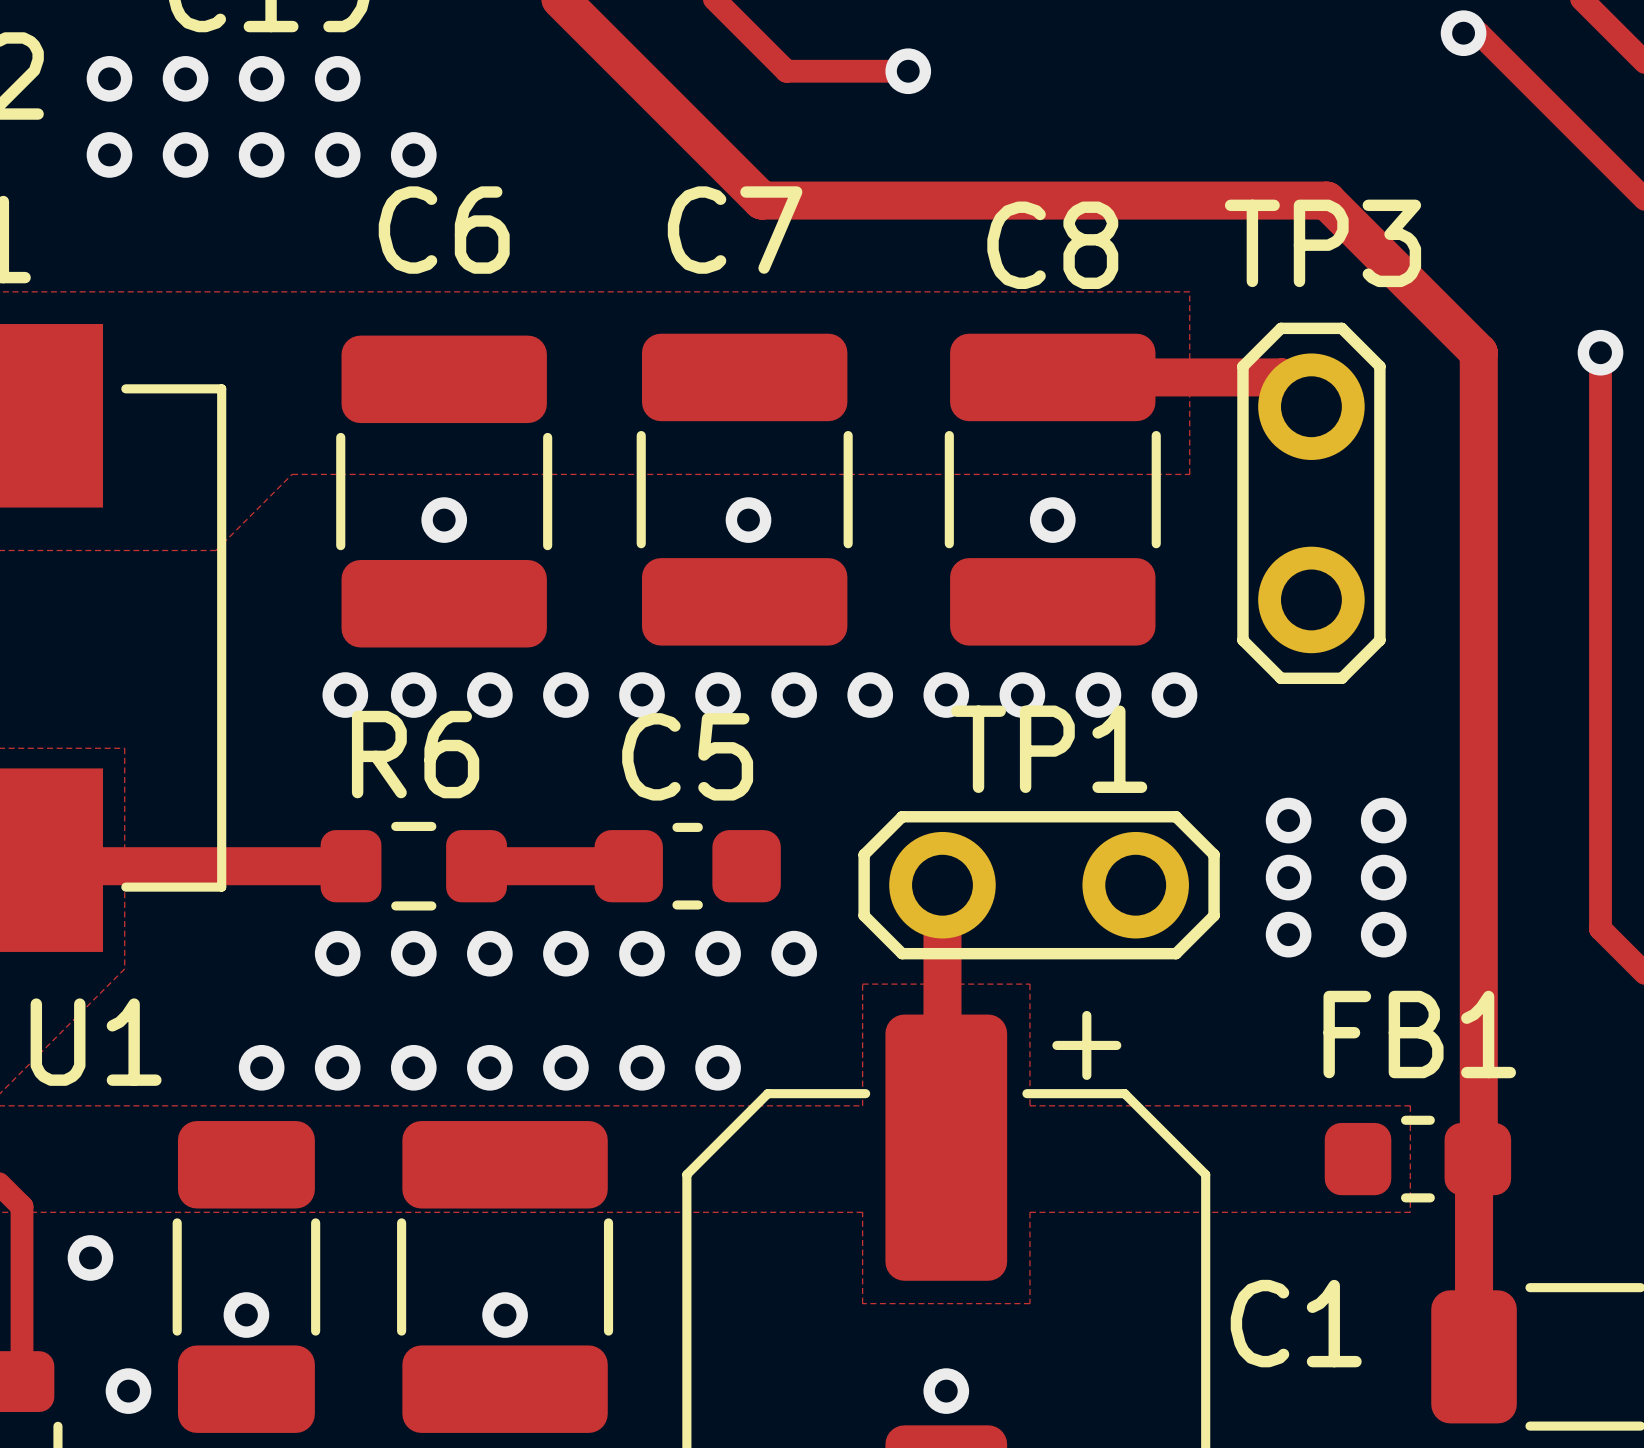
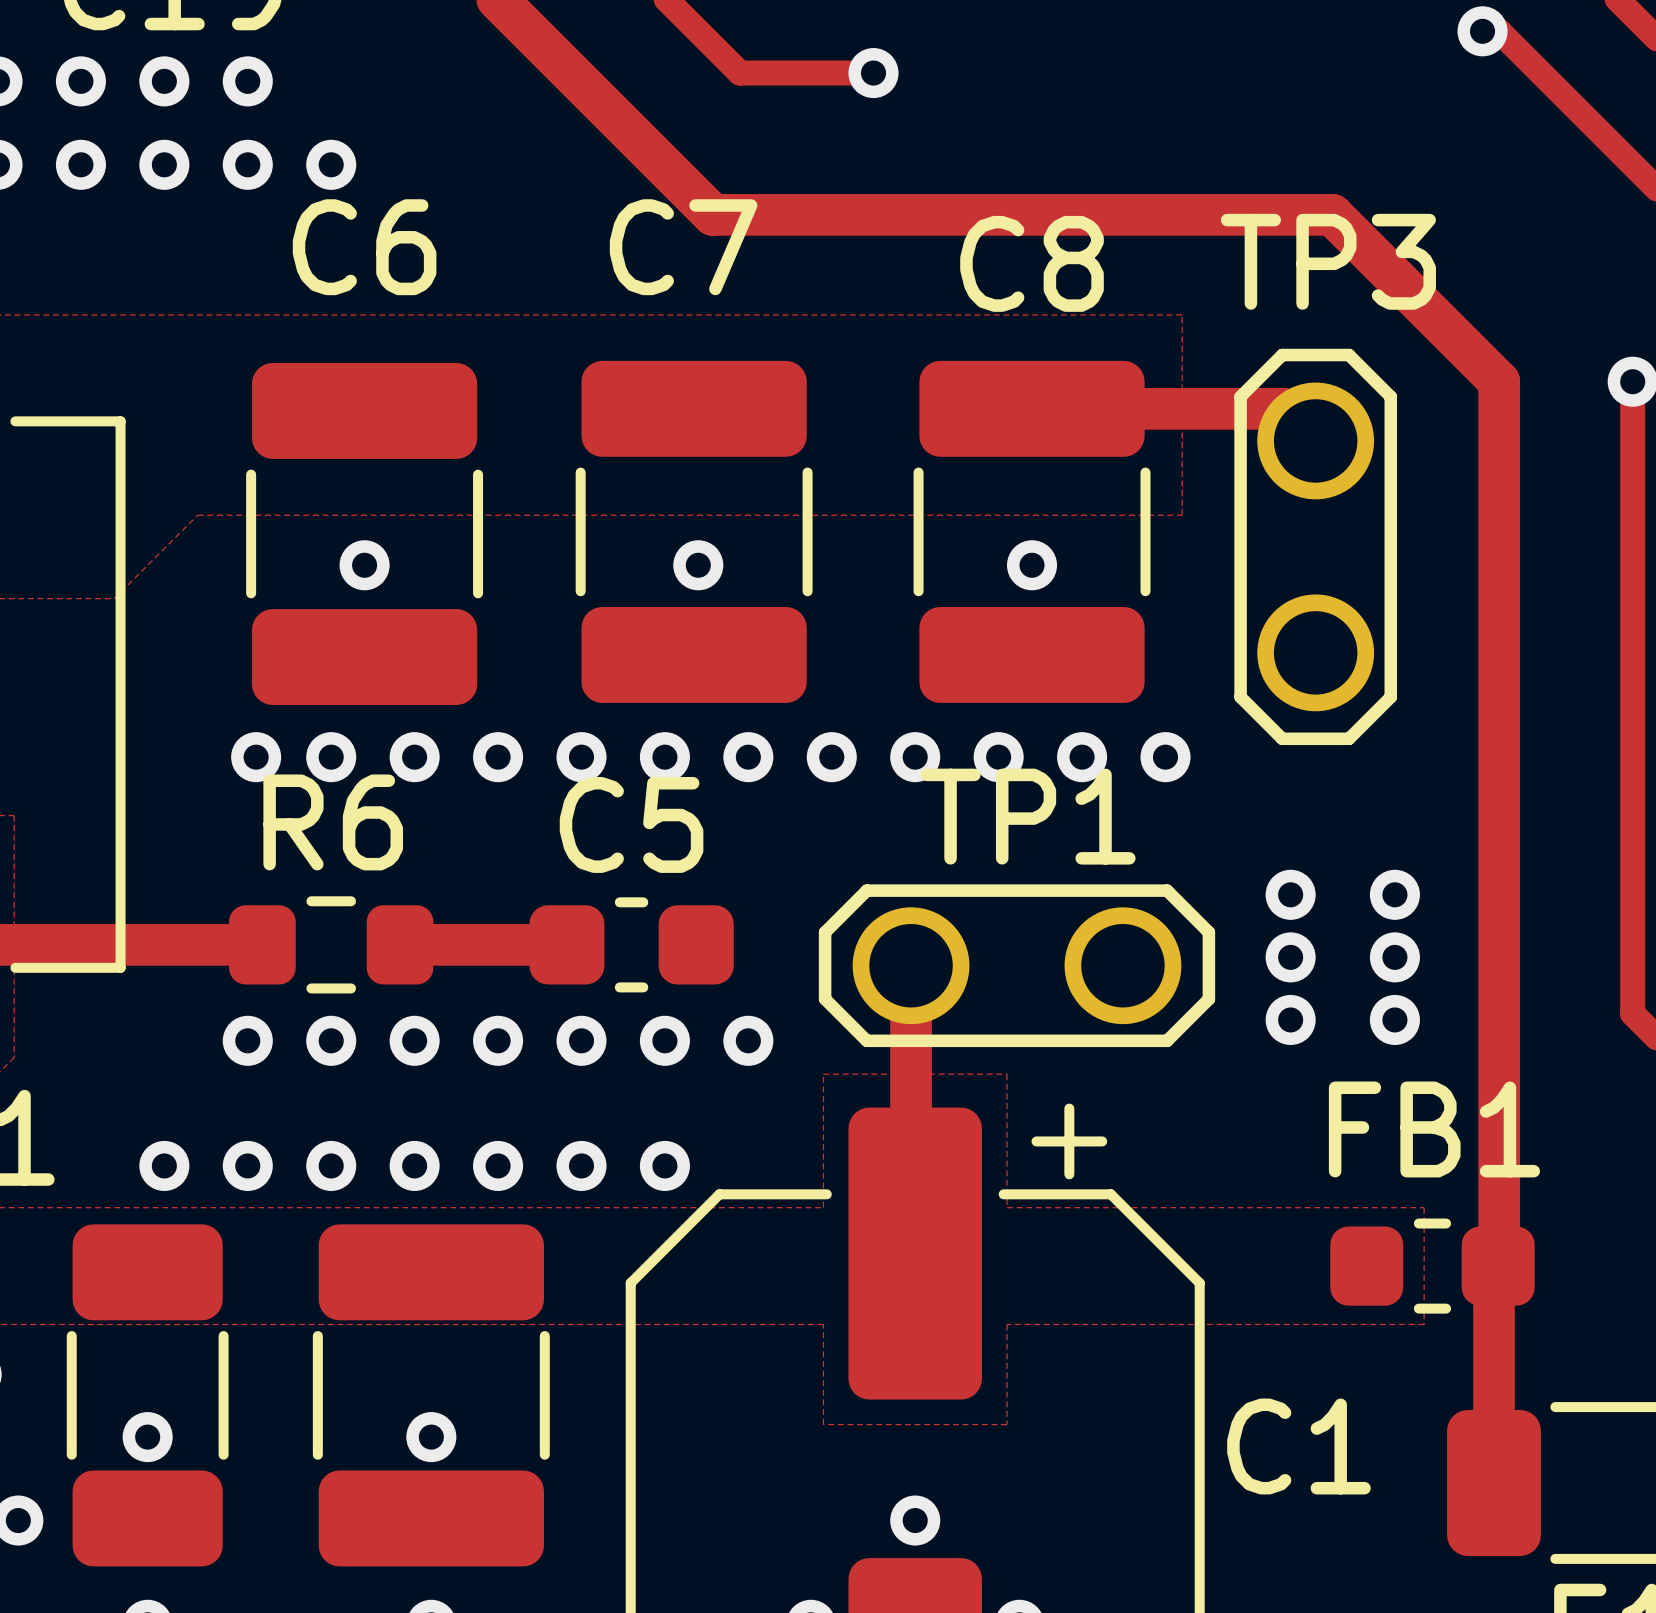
TP3 footprint: [1237, 322, 1386, 685] -> [1234, 348, 1398, 746]
TP1 footprint: [858, 811, 1220, 960] -> [818, 884, 1216, 1048]

